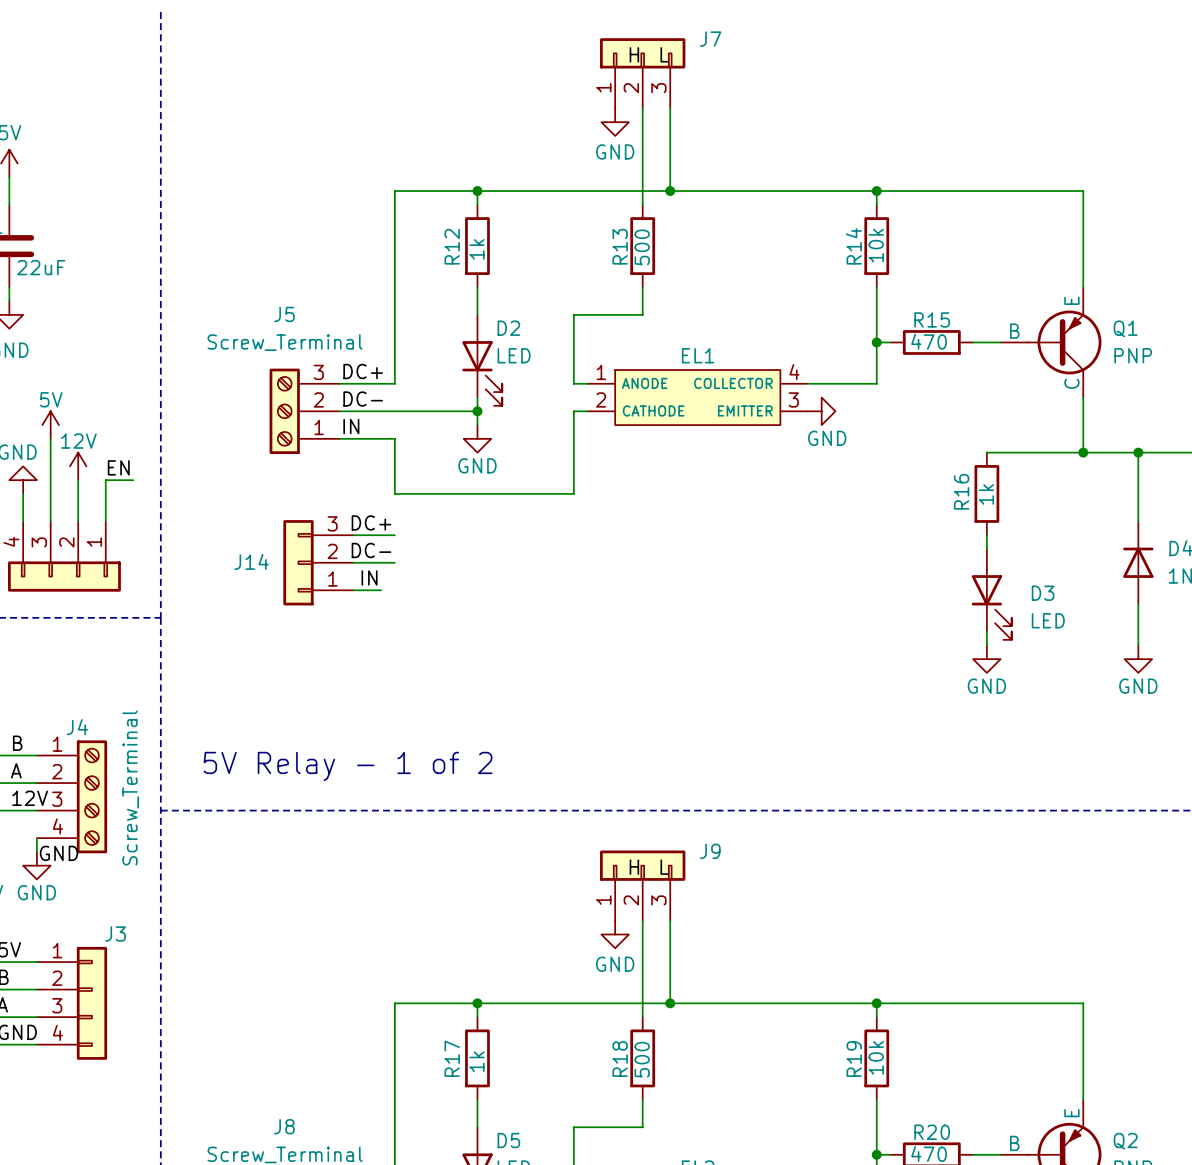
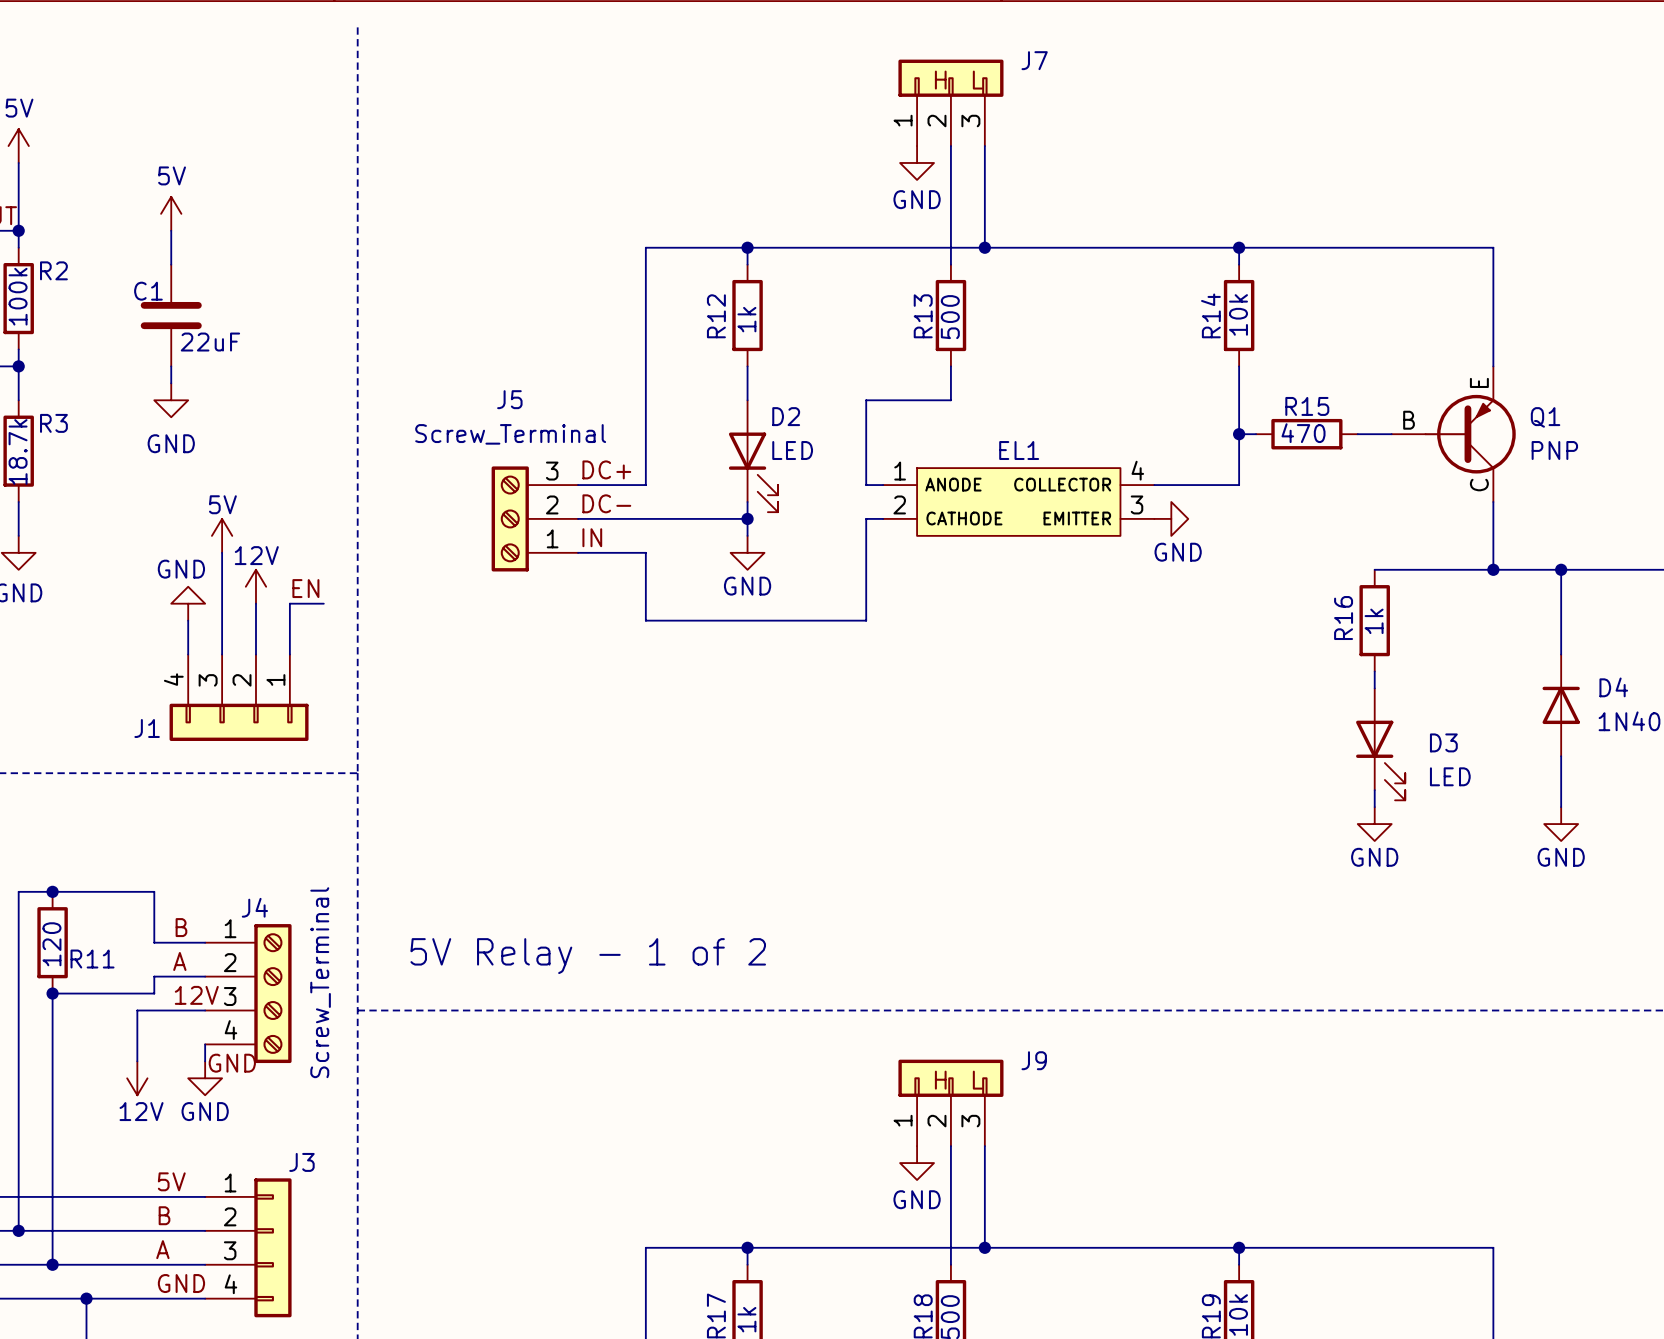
label: DC+ (371, 522) -> none
wire: (353, 535) (394, 535) -> none
label: DC- (371, 550) -> none
J14: (318, 562) -> none
wire: (353, 562) (394, 562) -> none
label: IN (369, 578) -> none
wire: (353, 590) (381, 590) -> none

